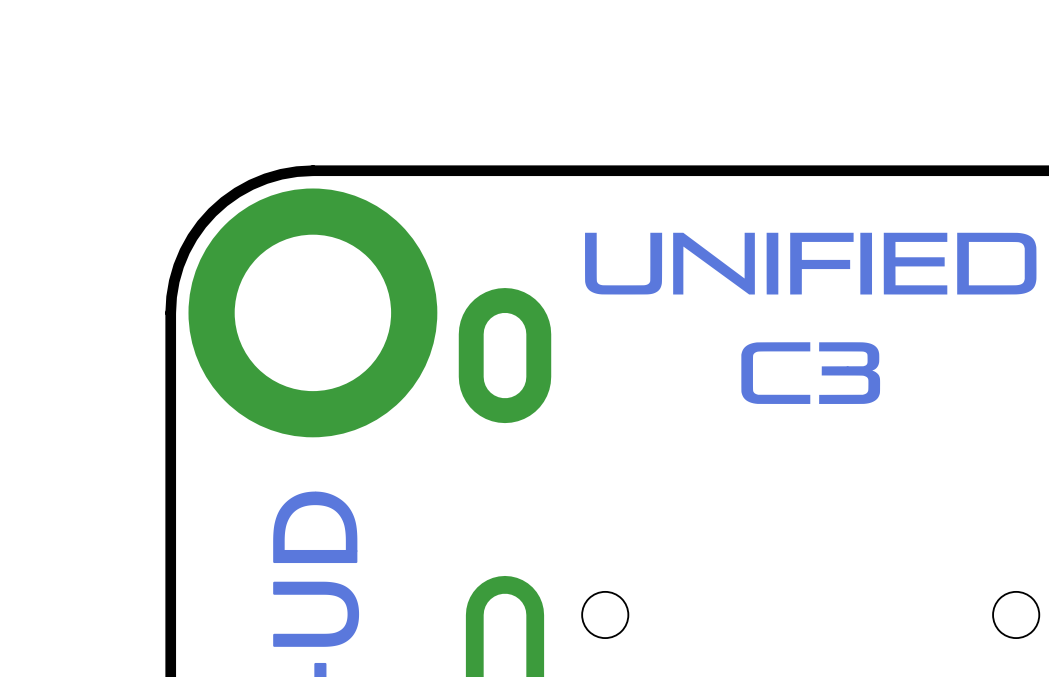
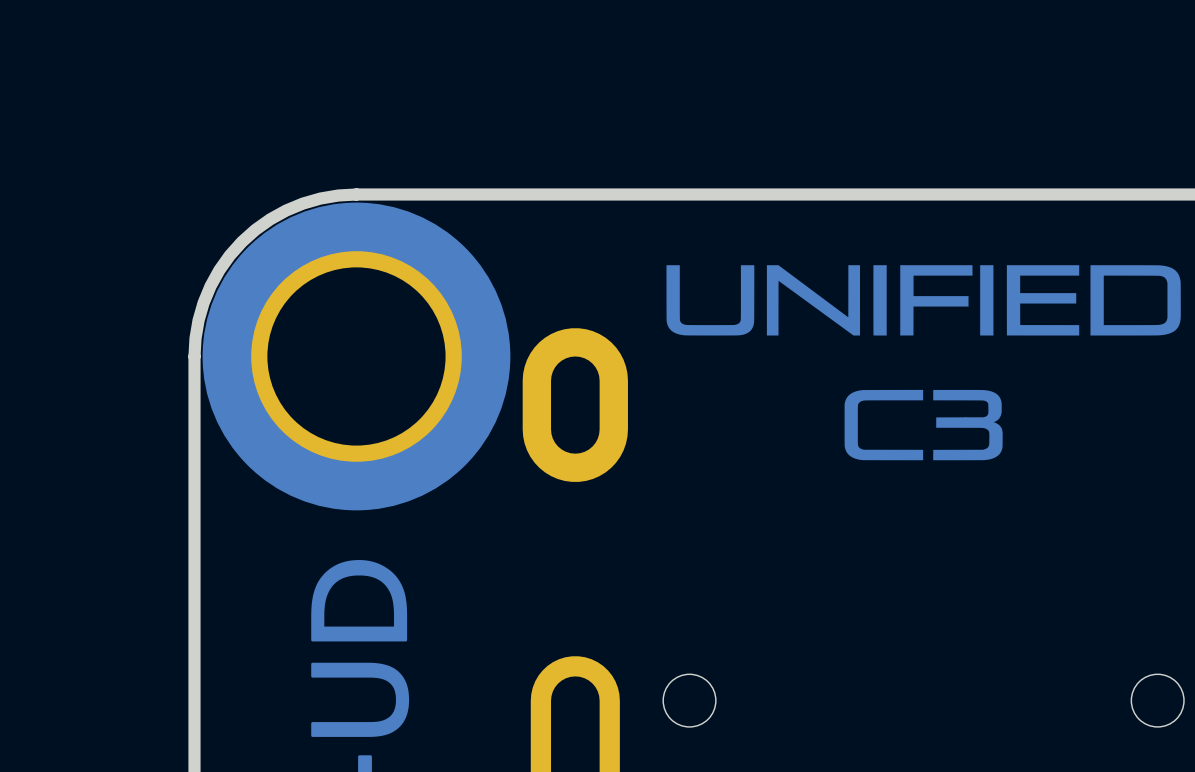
part footprint: [188, 188, 438, 438] -> [202, 202, 511, 511]

